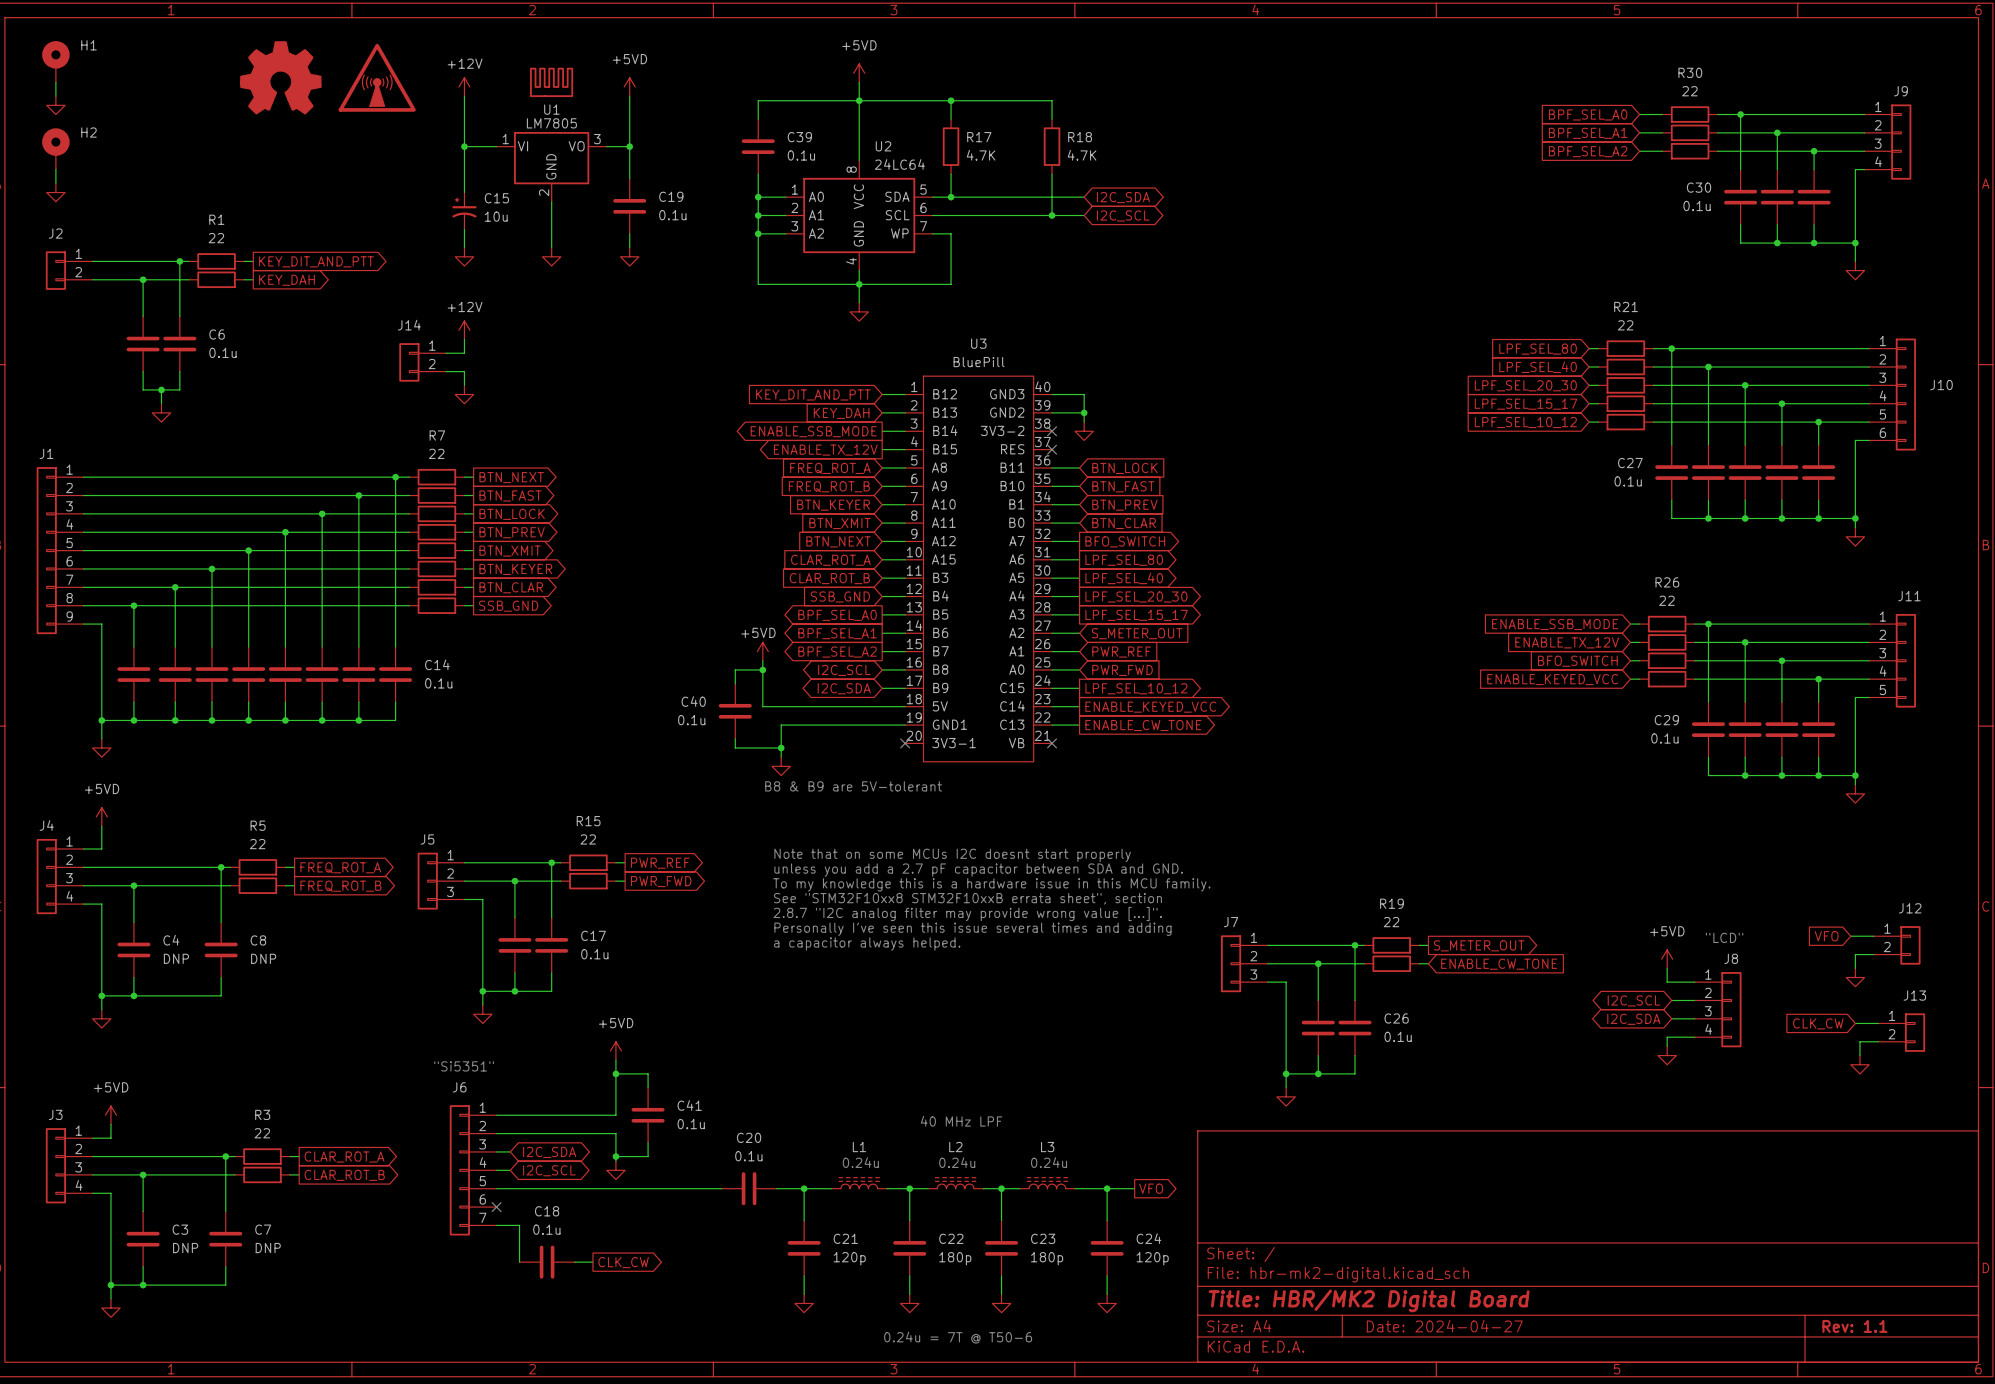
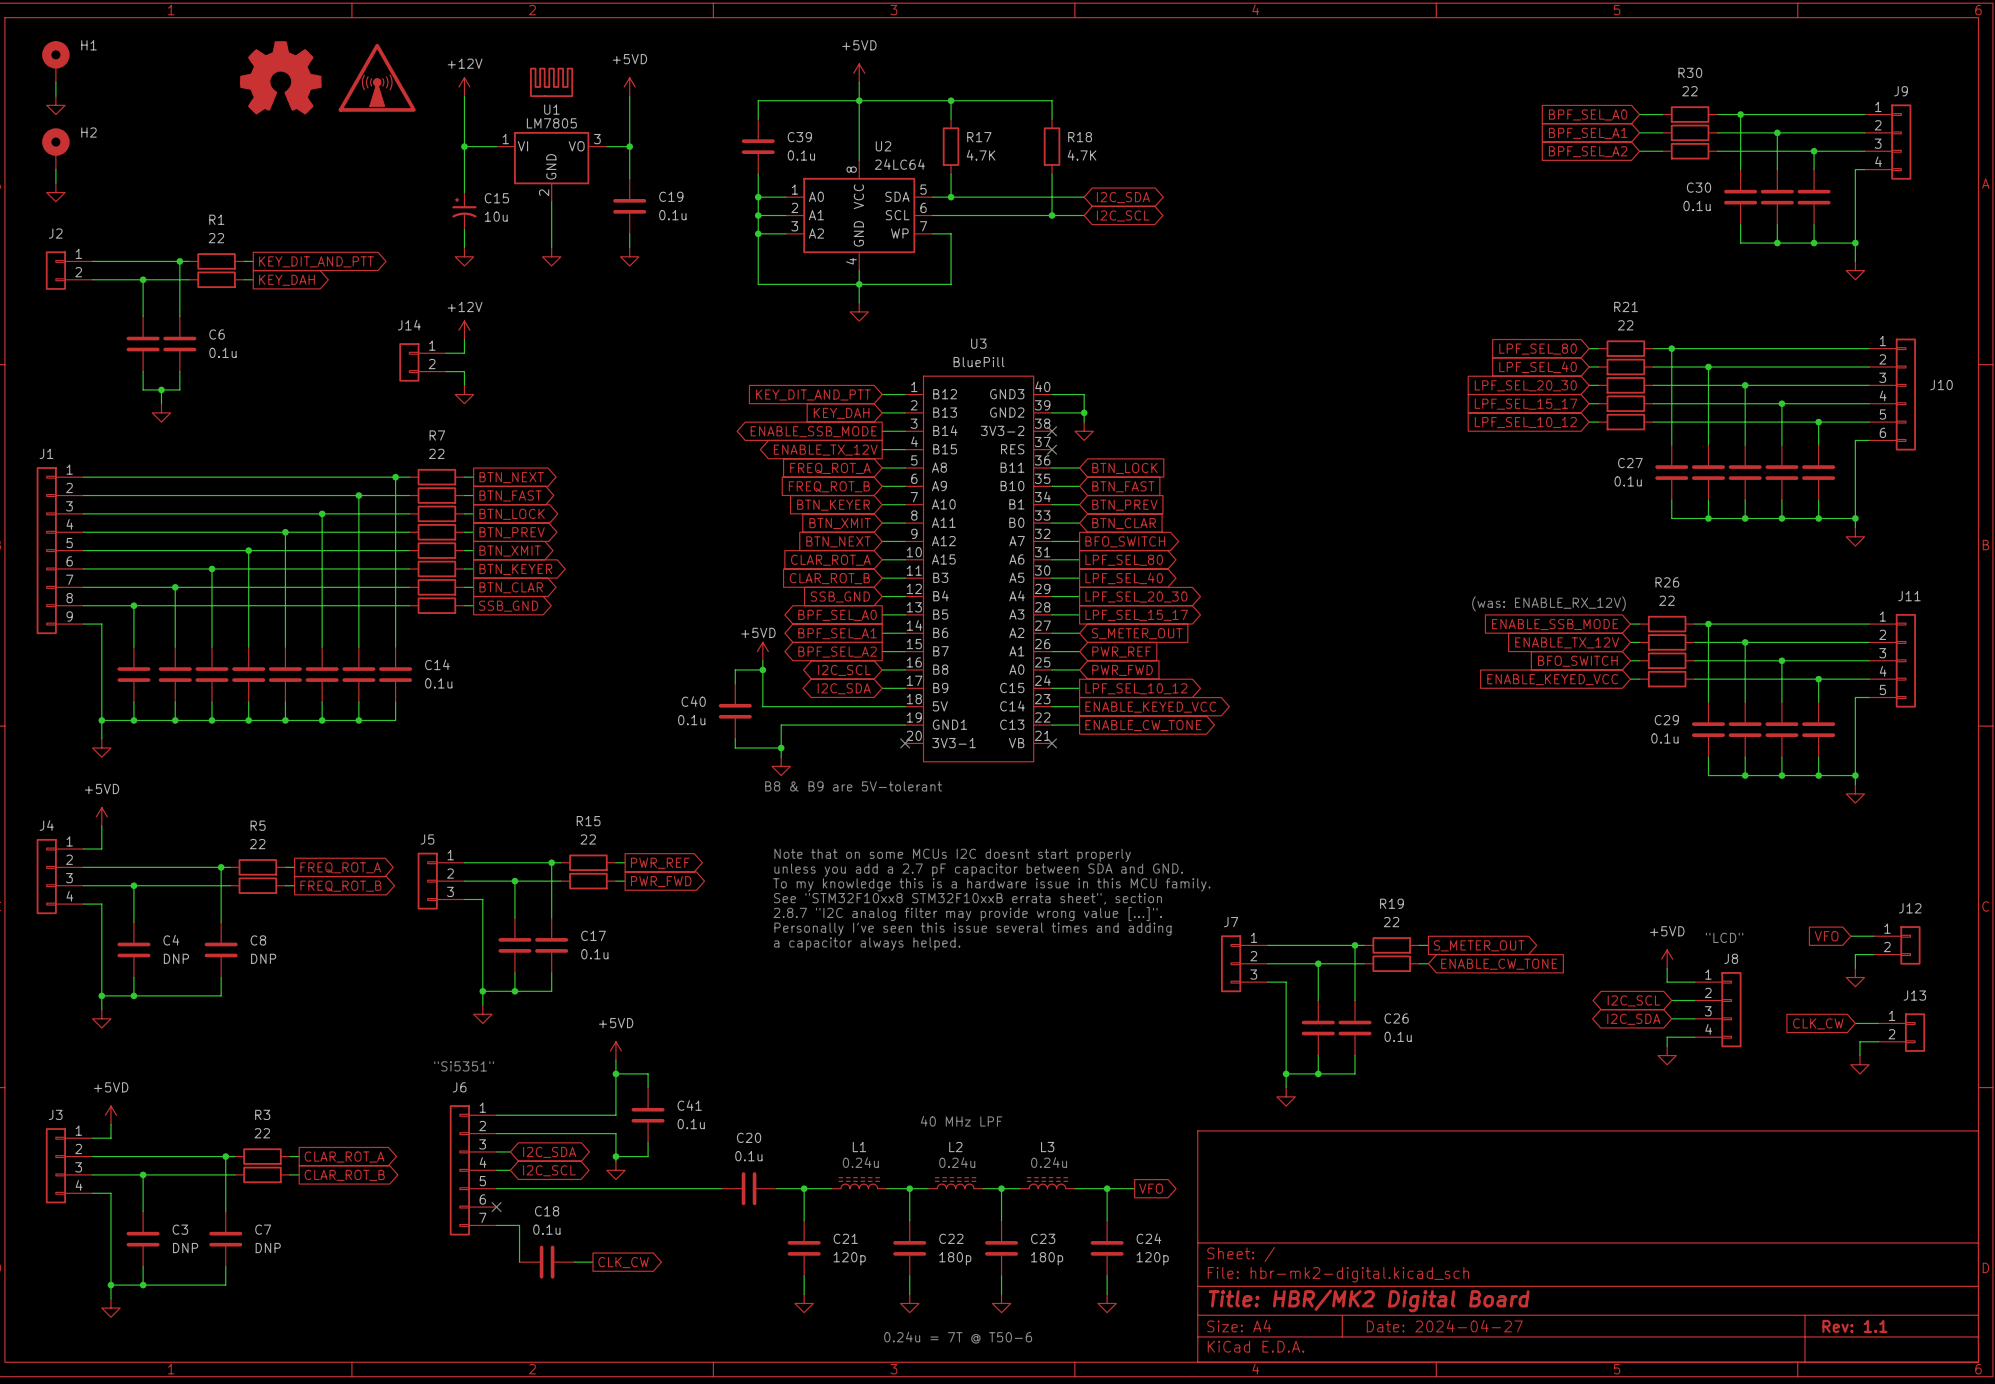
text: none -> (was: ENABLE_RX_12V) (1548, 603)

